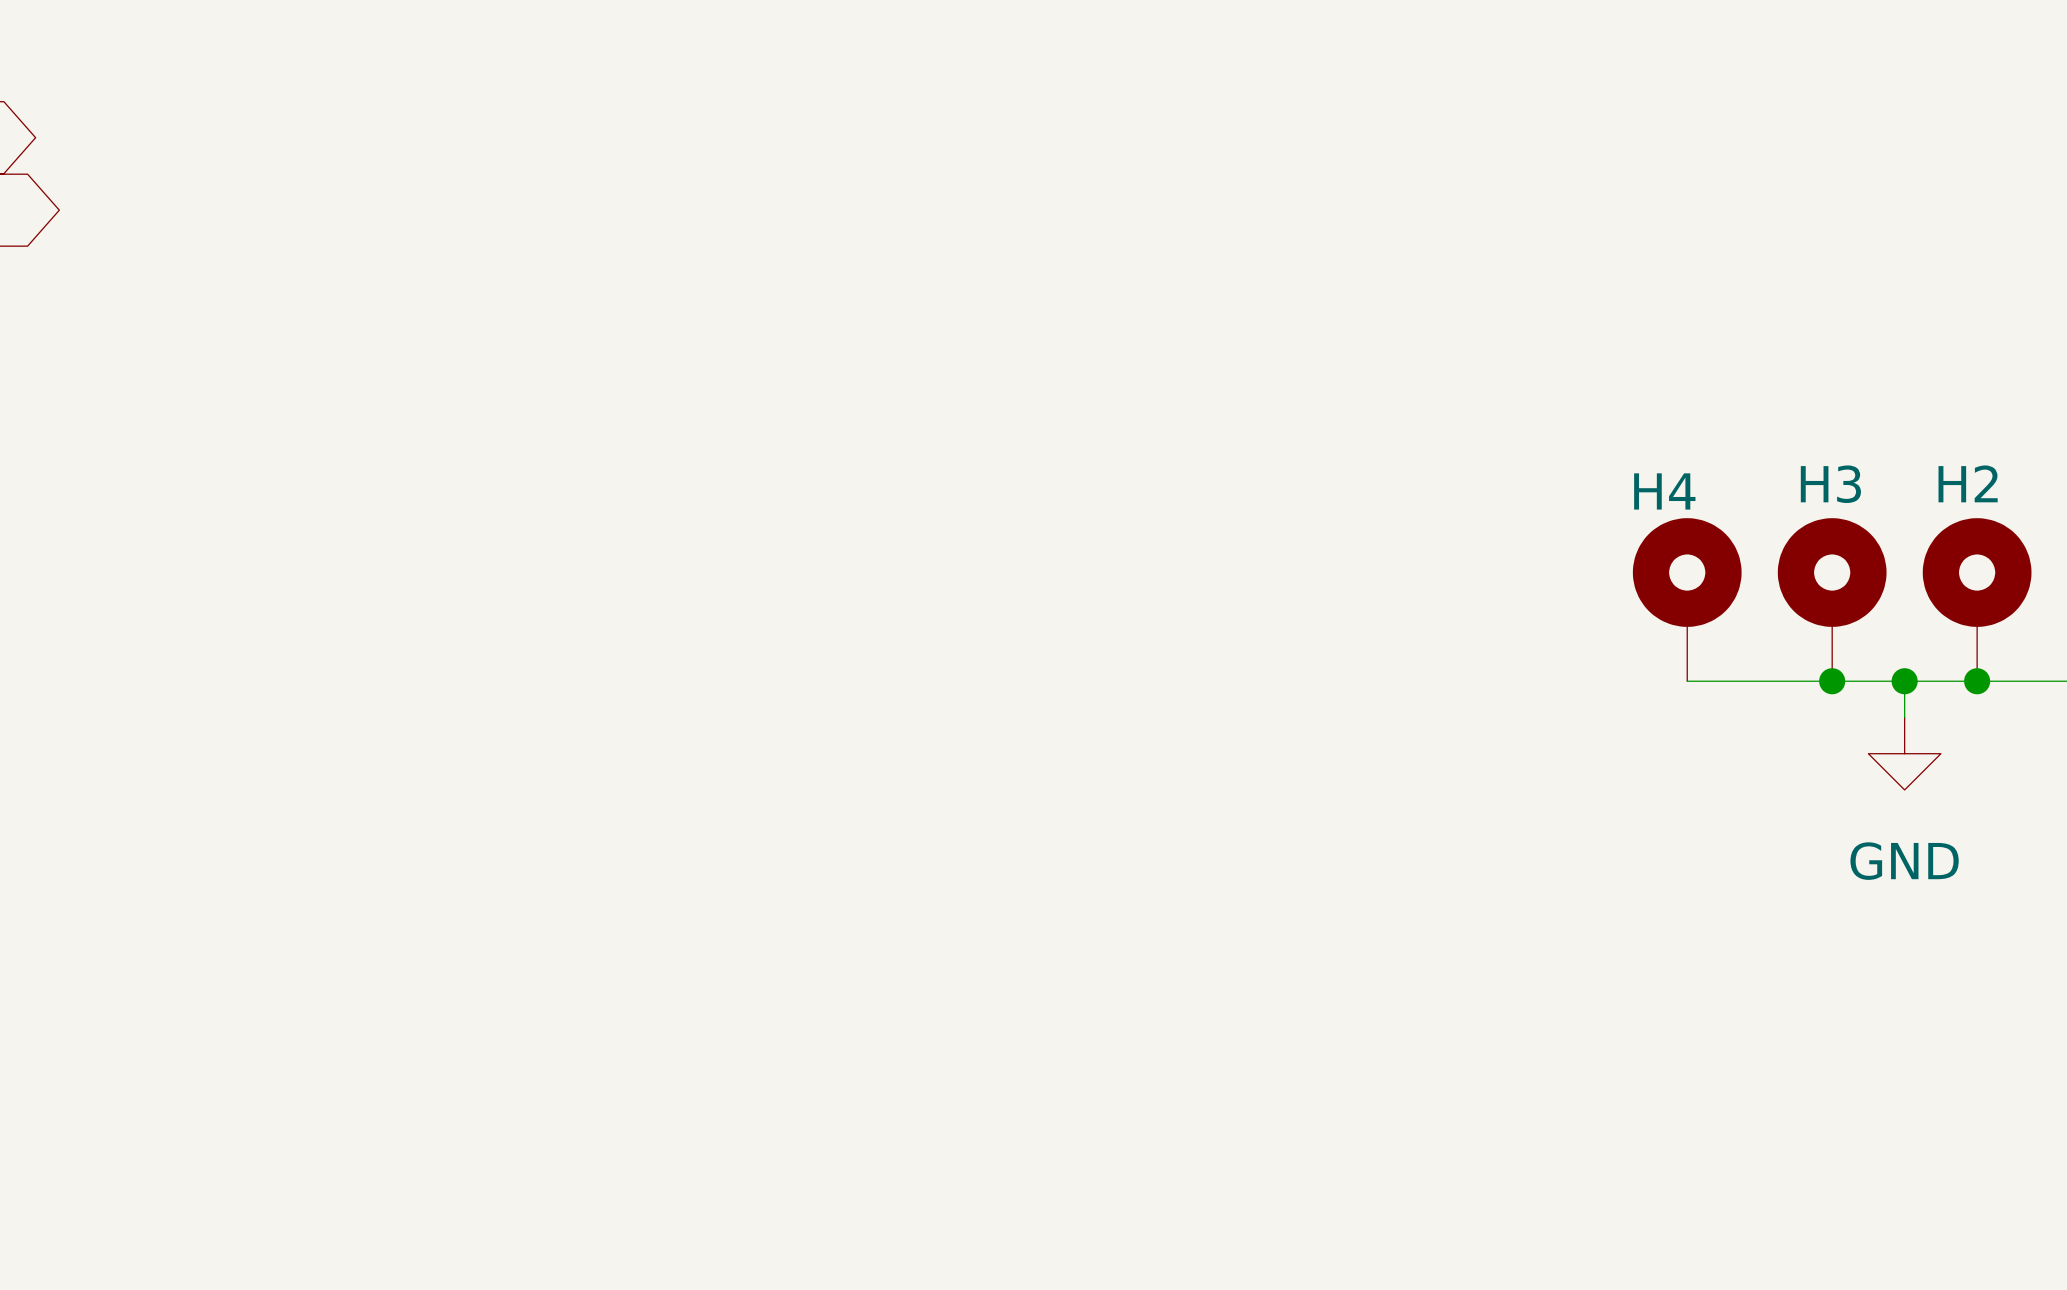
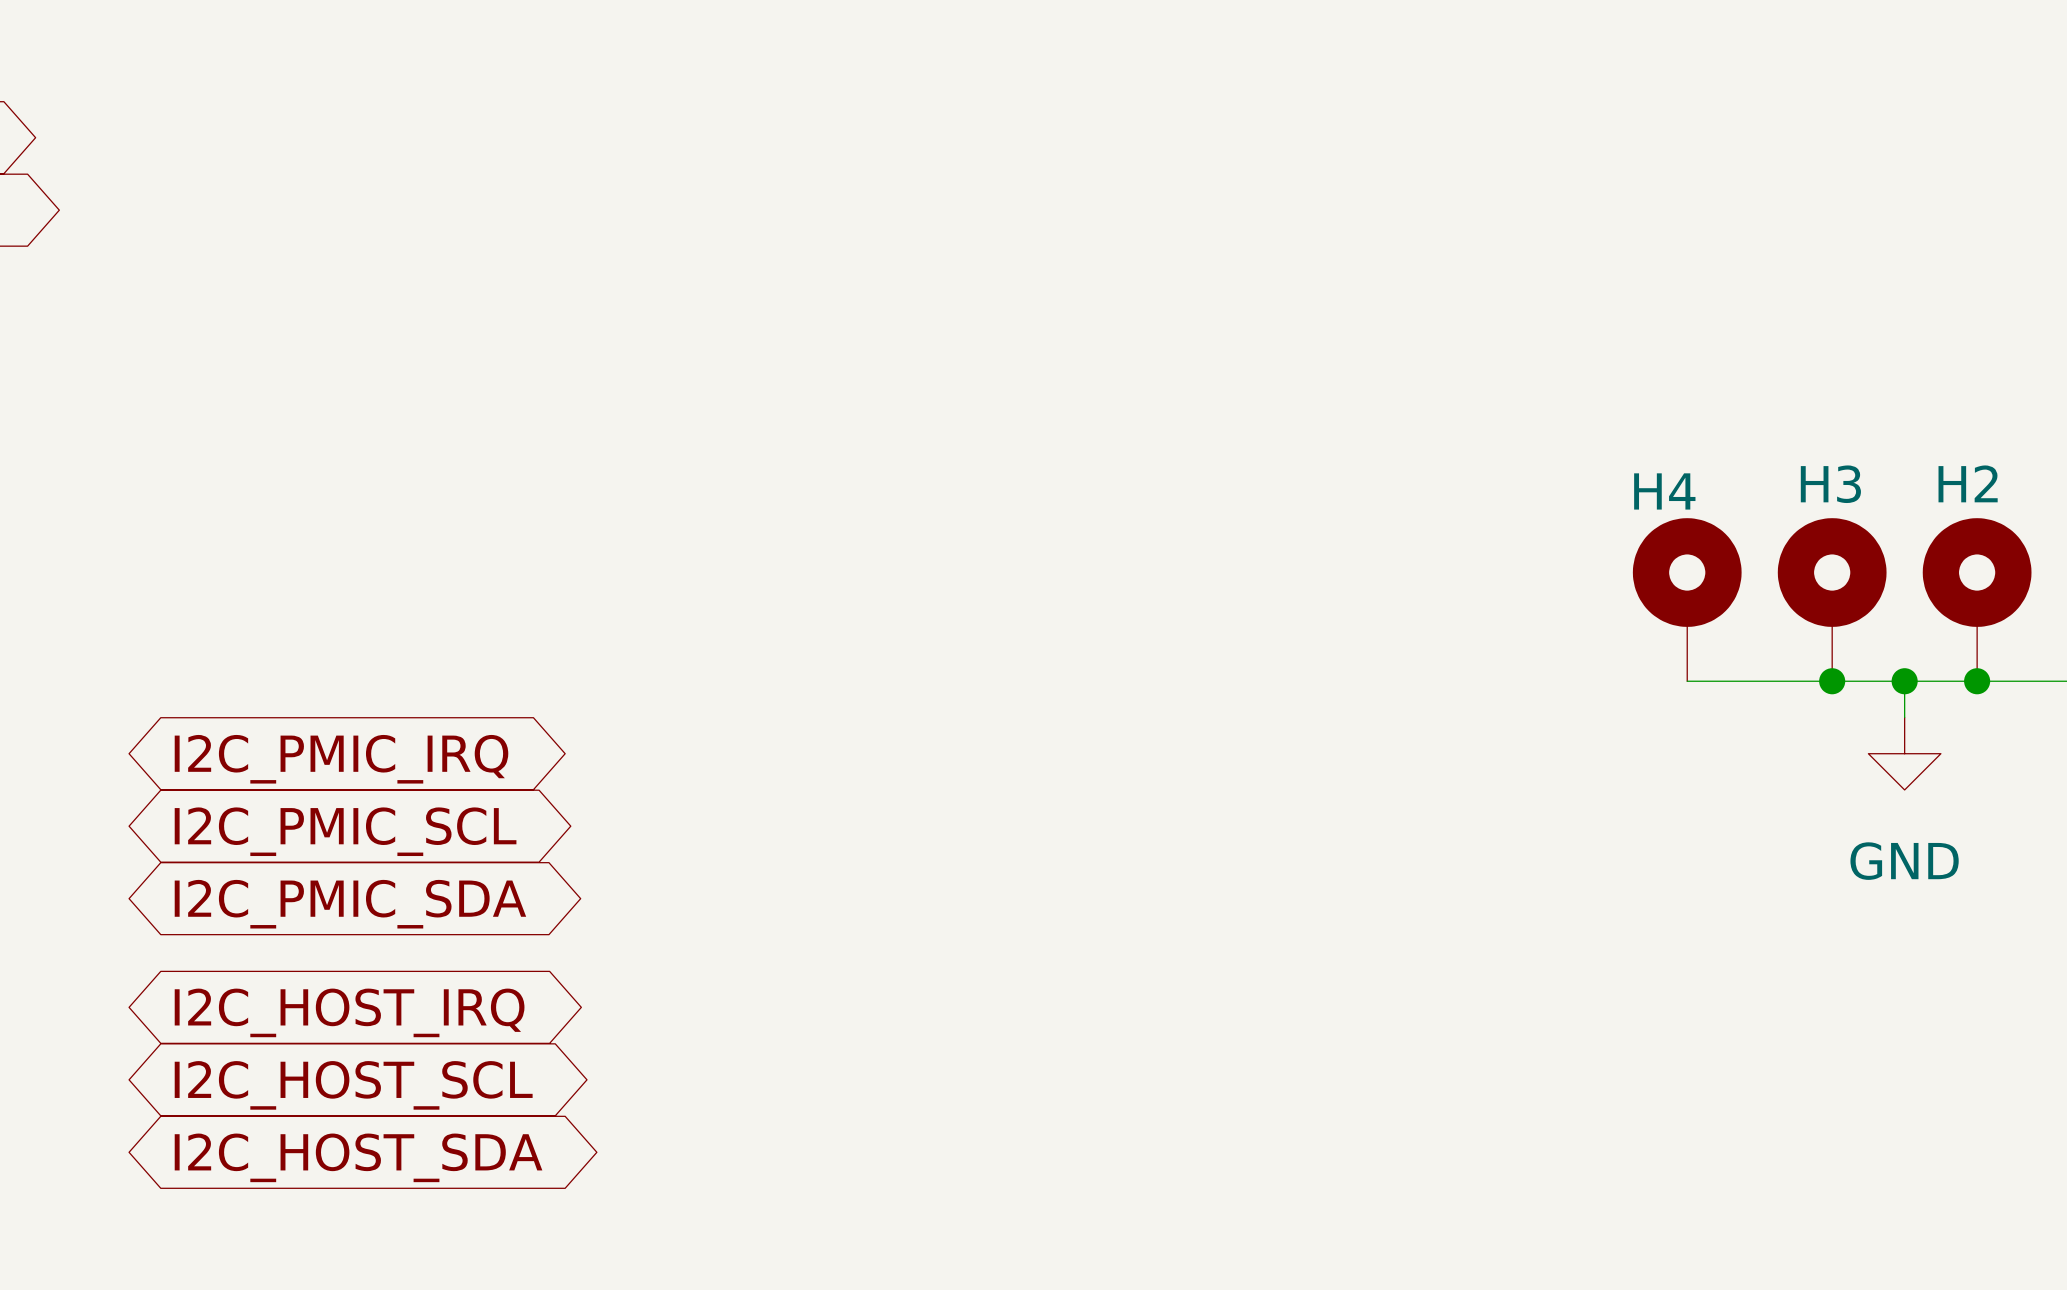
global label: none -> I2C_PMIC_IRQ (341, 759)
global label: none -> I2C_PMIC_SCL (345, 831)
global label: none -> I2C_PMIC_SDA (350, 904)
global label: none -> I2C_HOST_IRQ (349, 1012)
global label: none -> I2C_HOST_SCL (353, 1085)
global label: none -> I2C_HOST_SDA (358, 1157)

